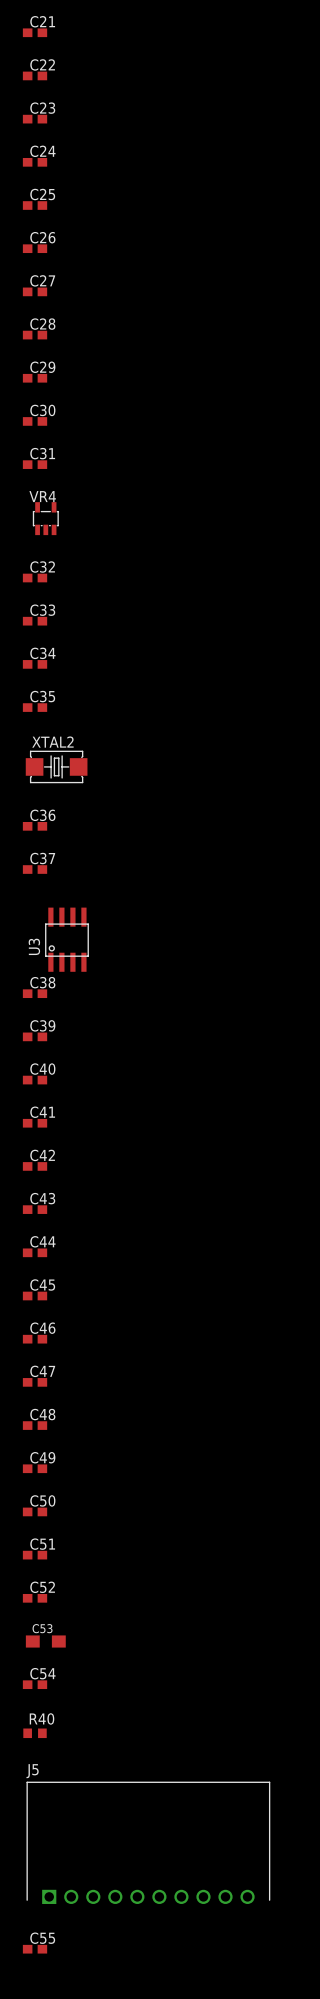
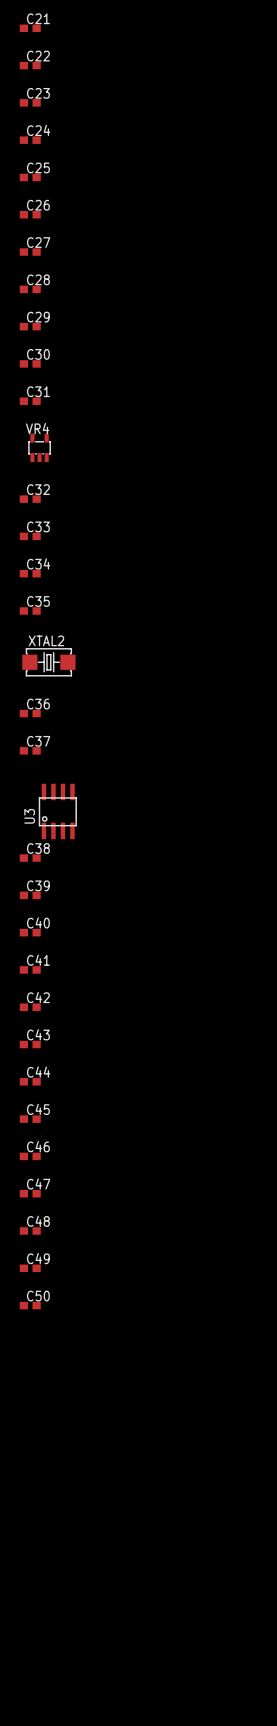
C51: (35, 1555) -> none
C52: (35, 1598) -> none
C53: (45, 1641) -> none
C54: (35, 1684) -> none
R40: (35, 1733) -> none
J5: (148, 1842) -> none
C55: (35, 1949) -> none

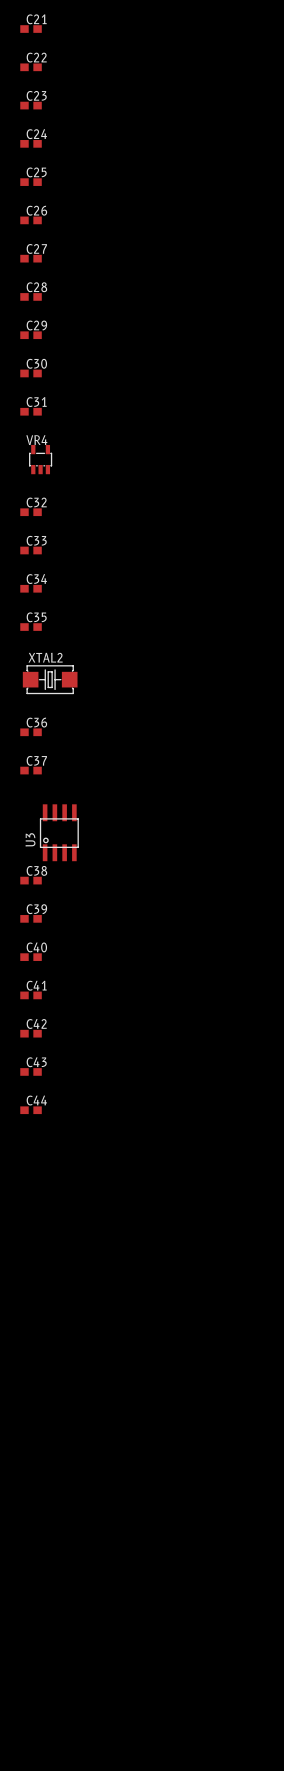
C45: (30, 1119) -> none
C46: (30, 1156) -> none
C47: (30, 1193) -> none
C48: (30, 1230) -> none
C49: (30, 1268) -> none
C50: (30, 1305) -> none

